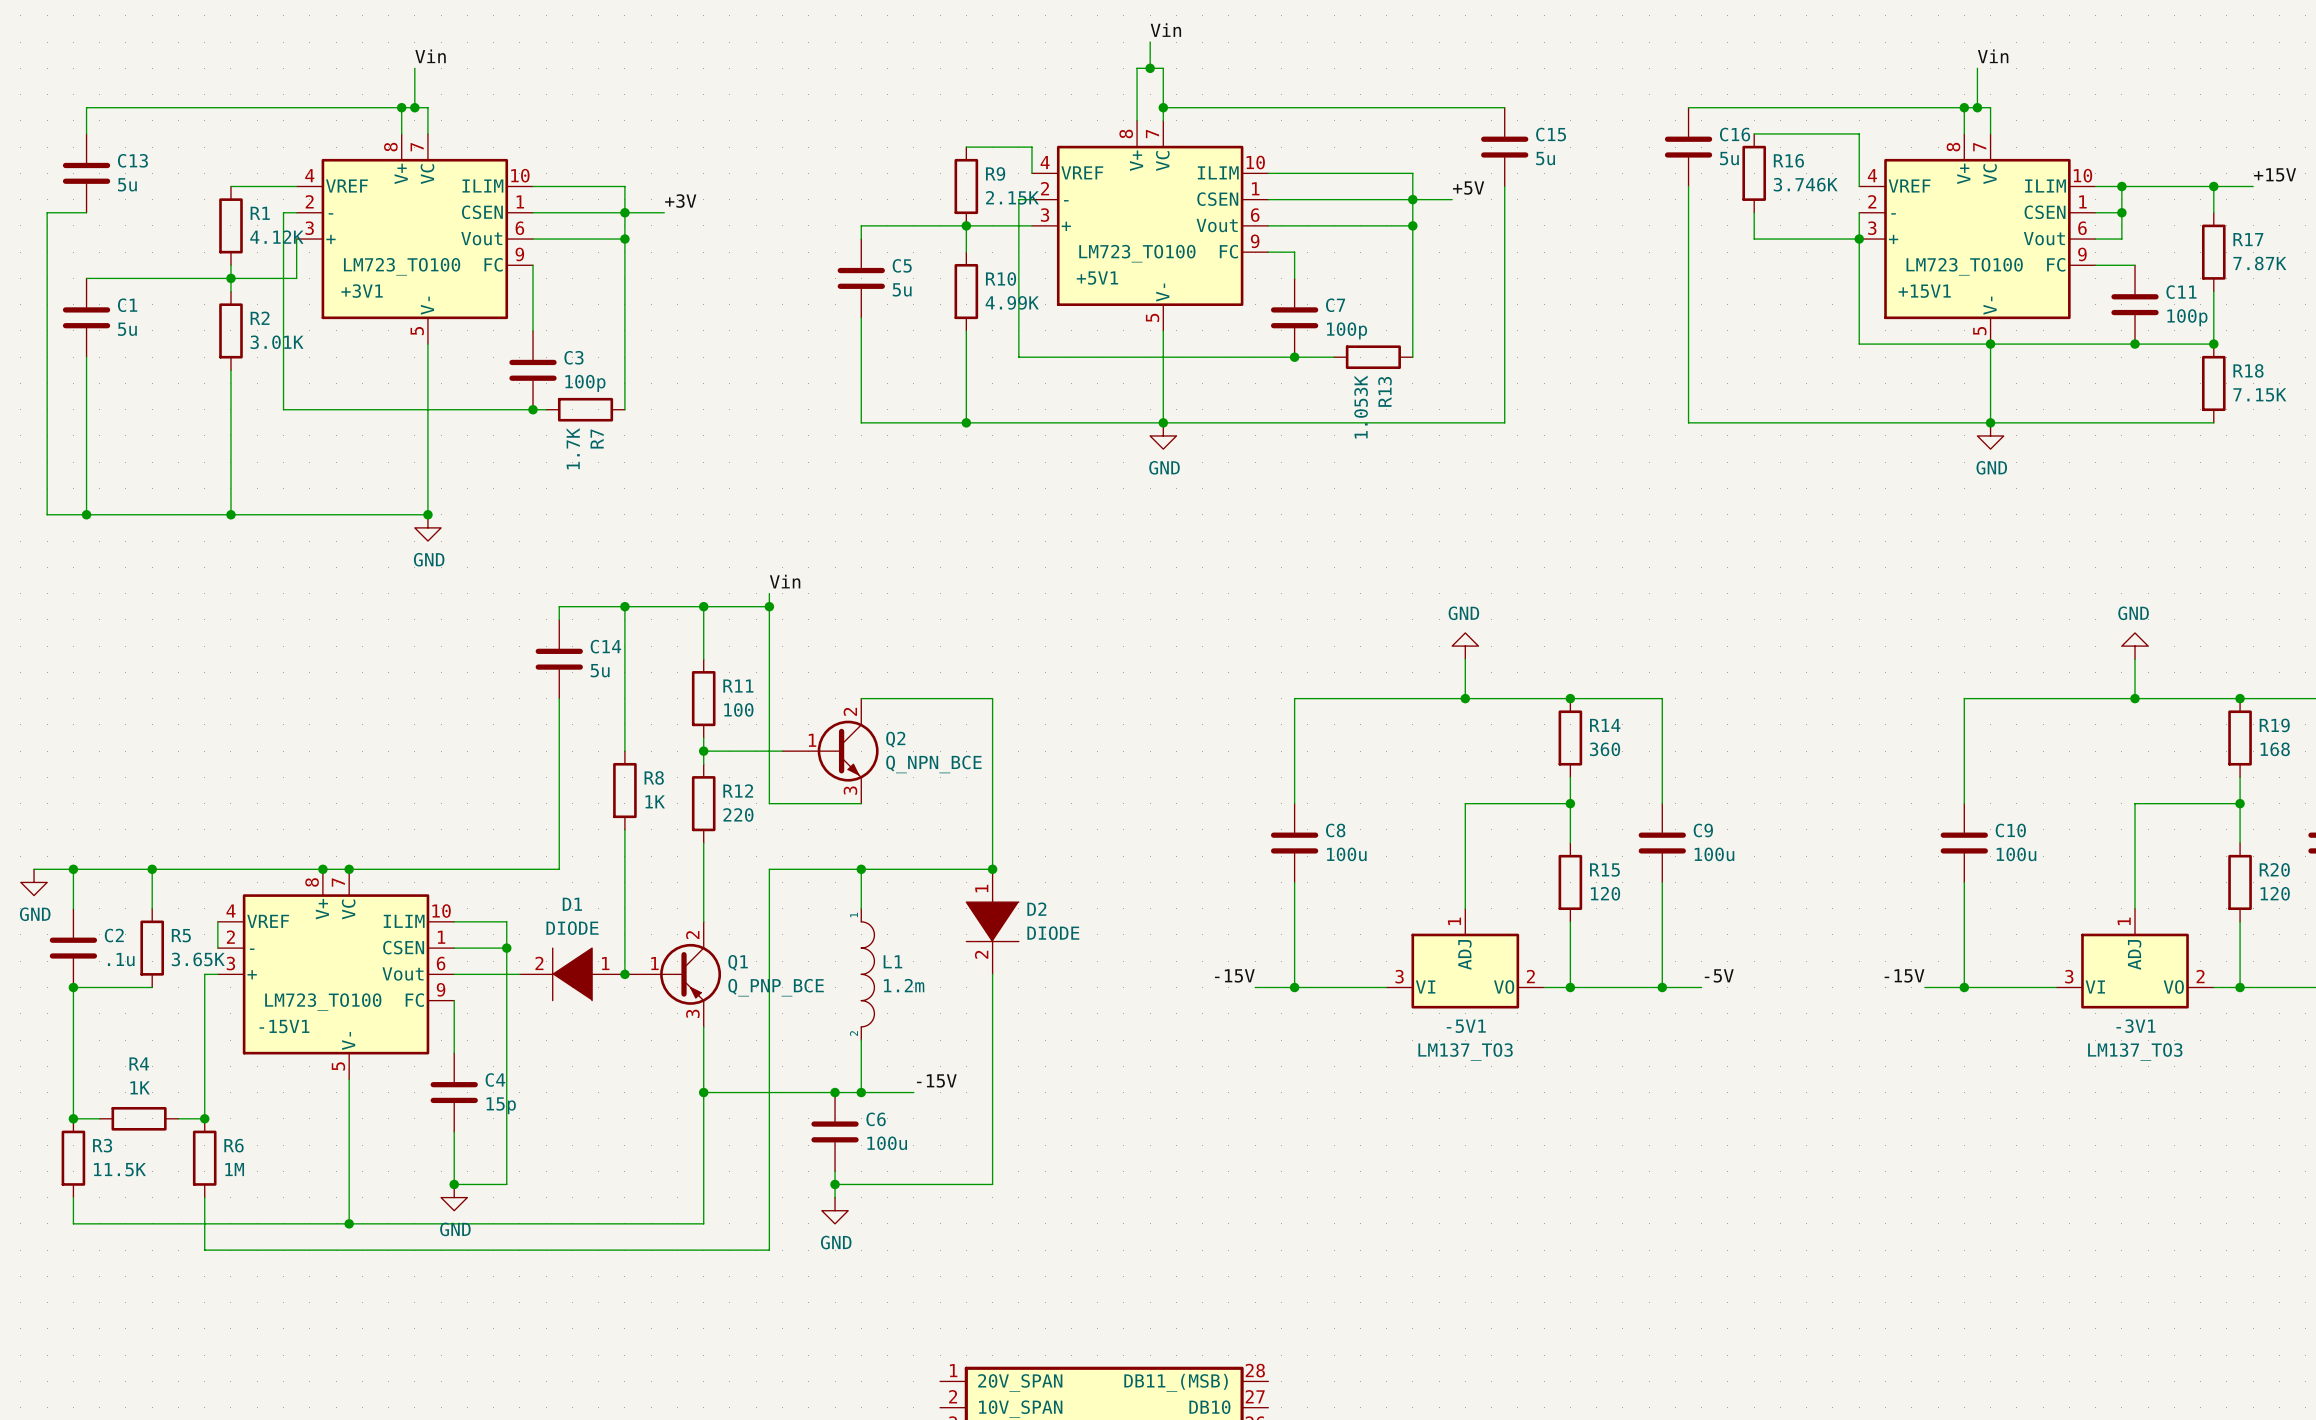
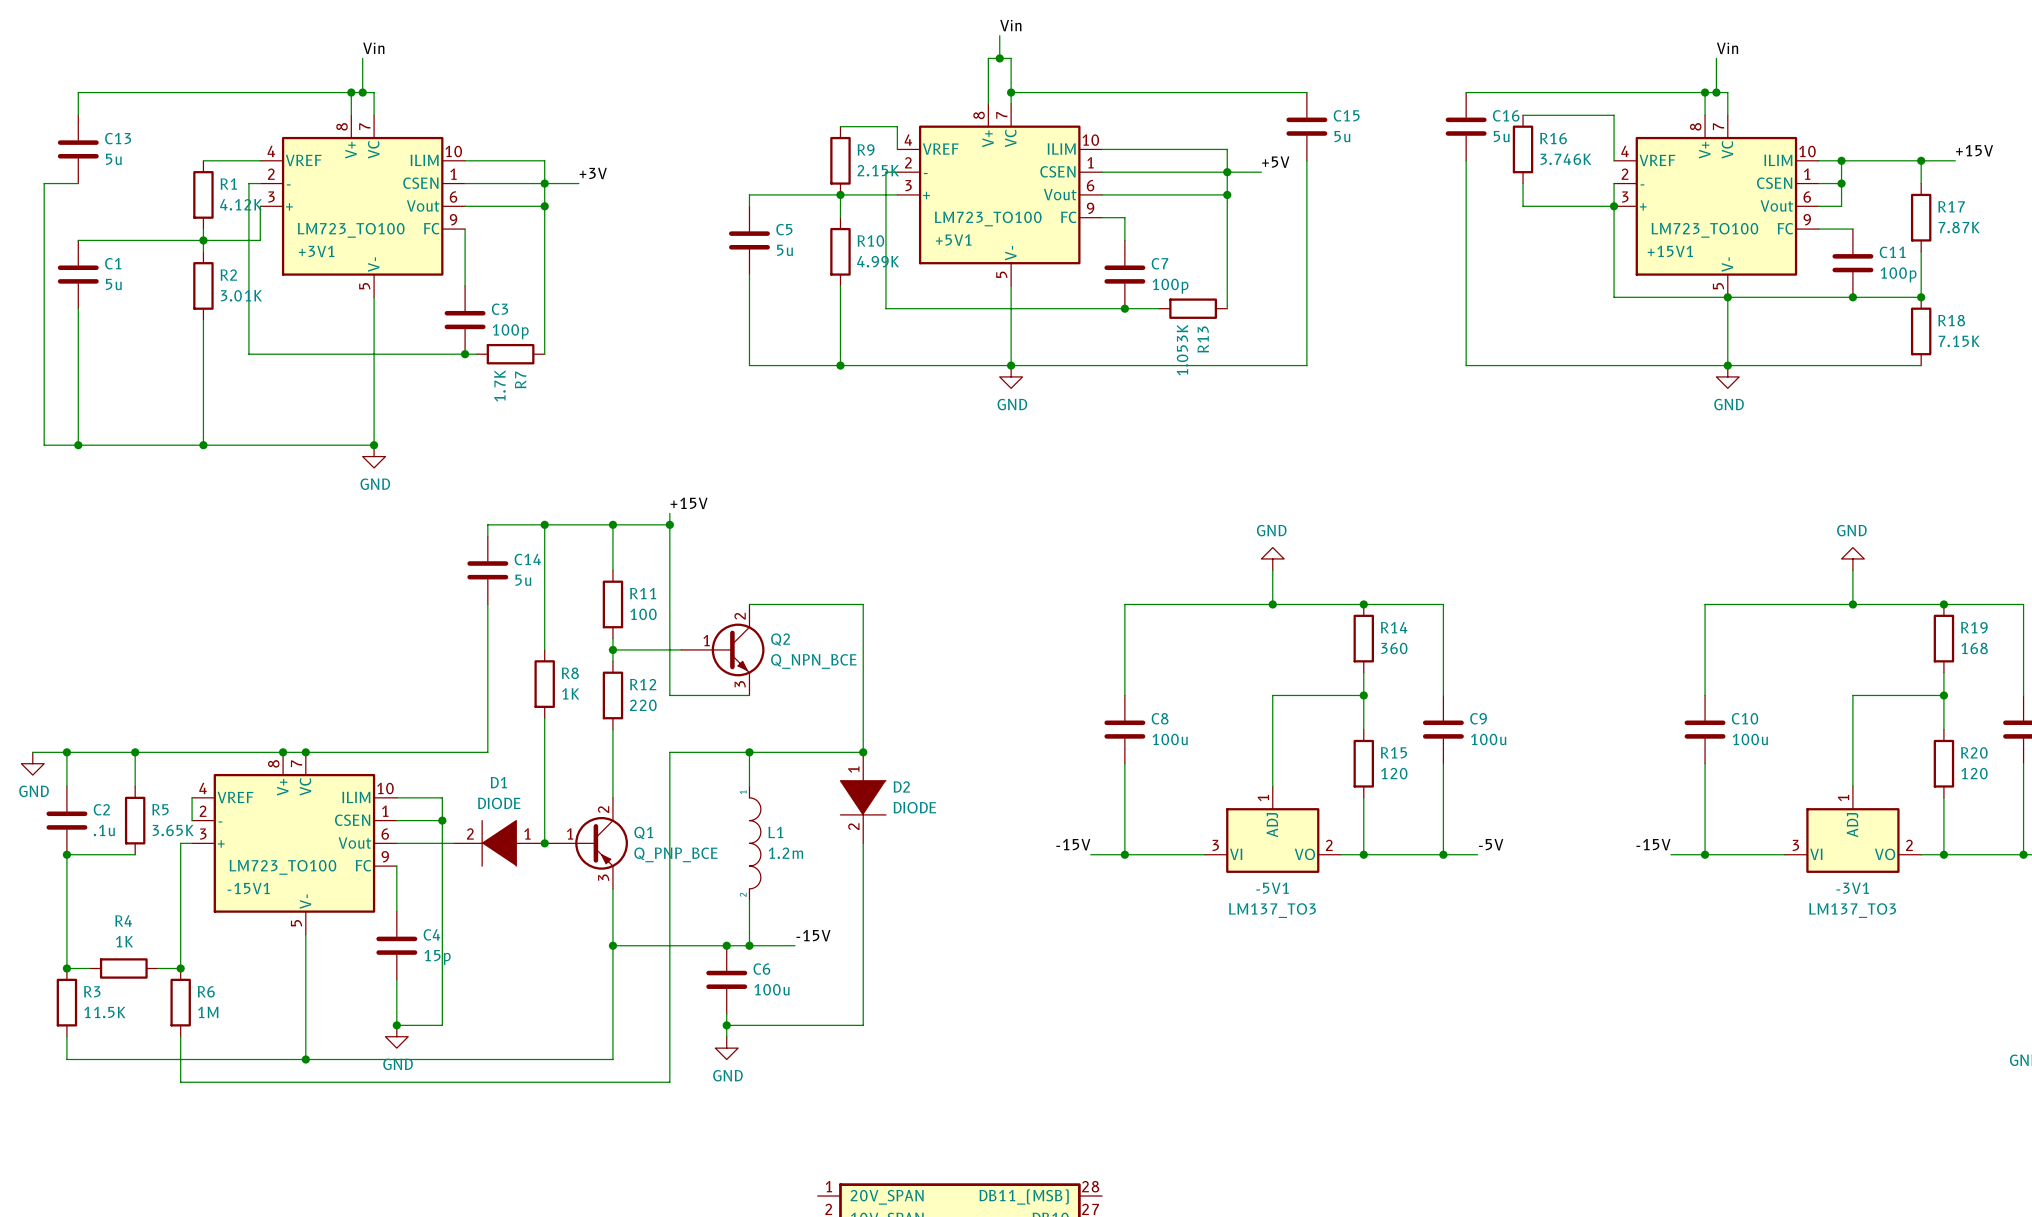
label: Vin (785, 581) -> +15V (689, 503)

